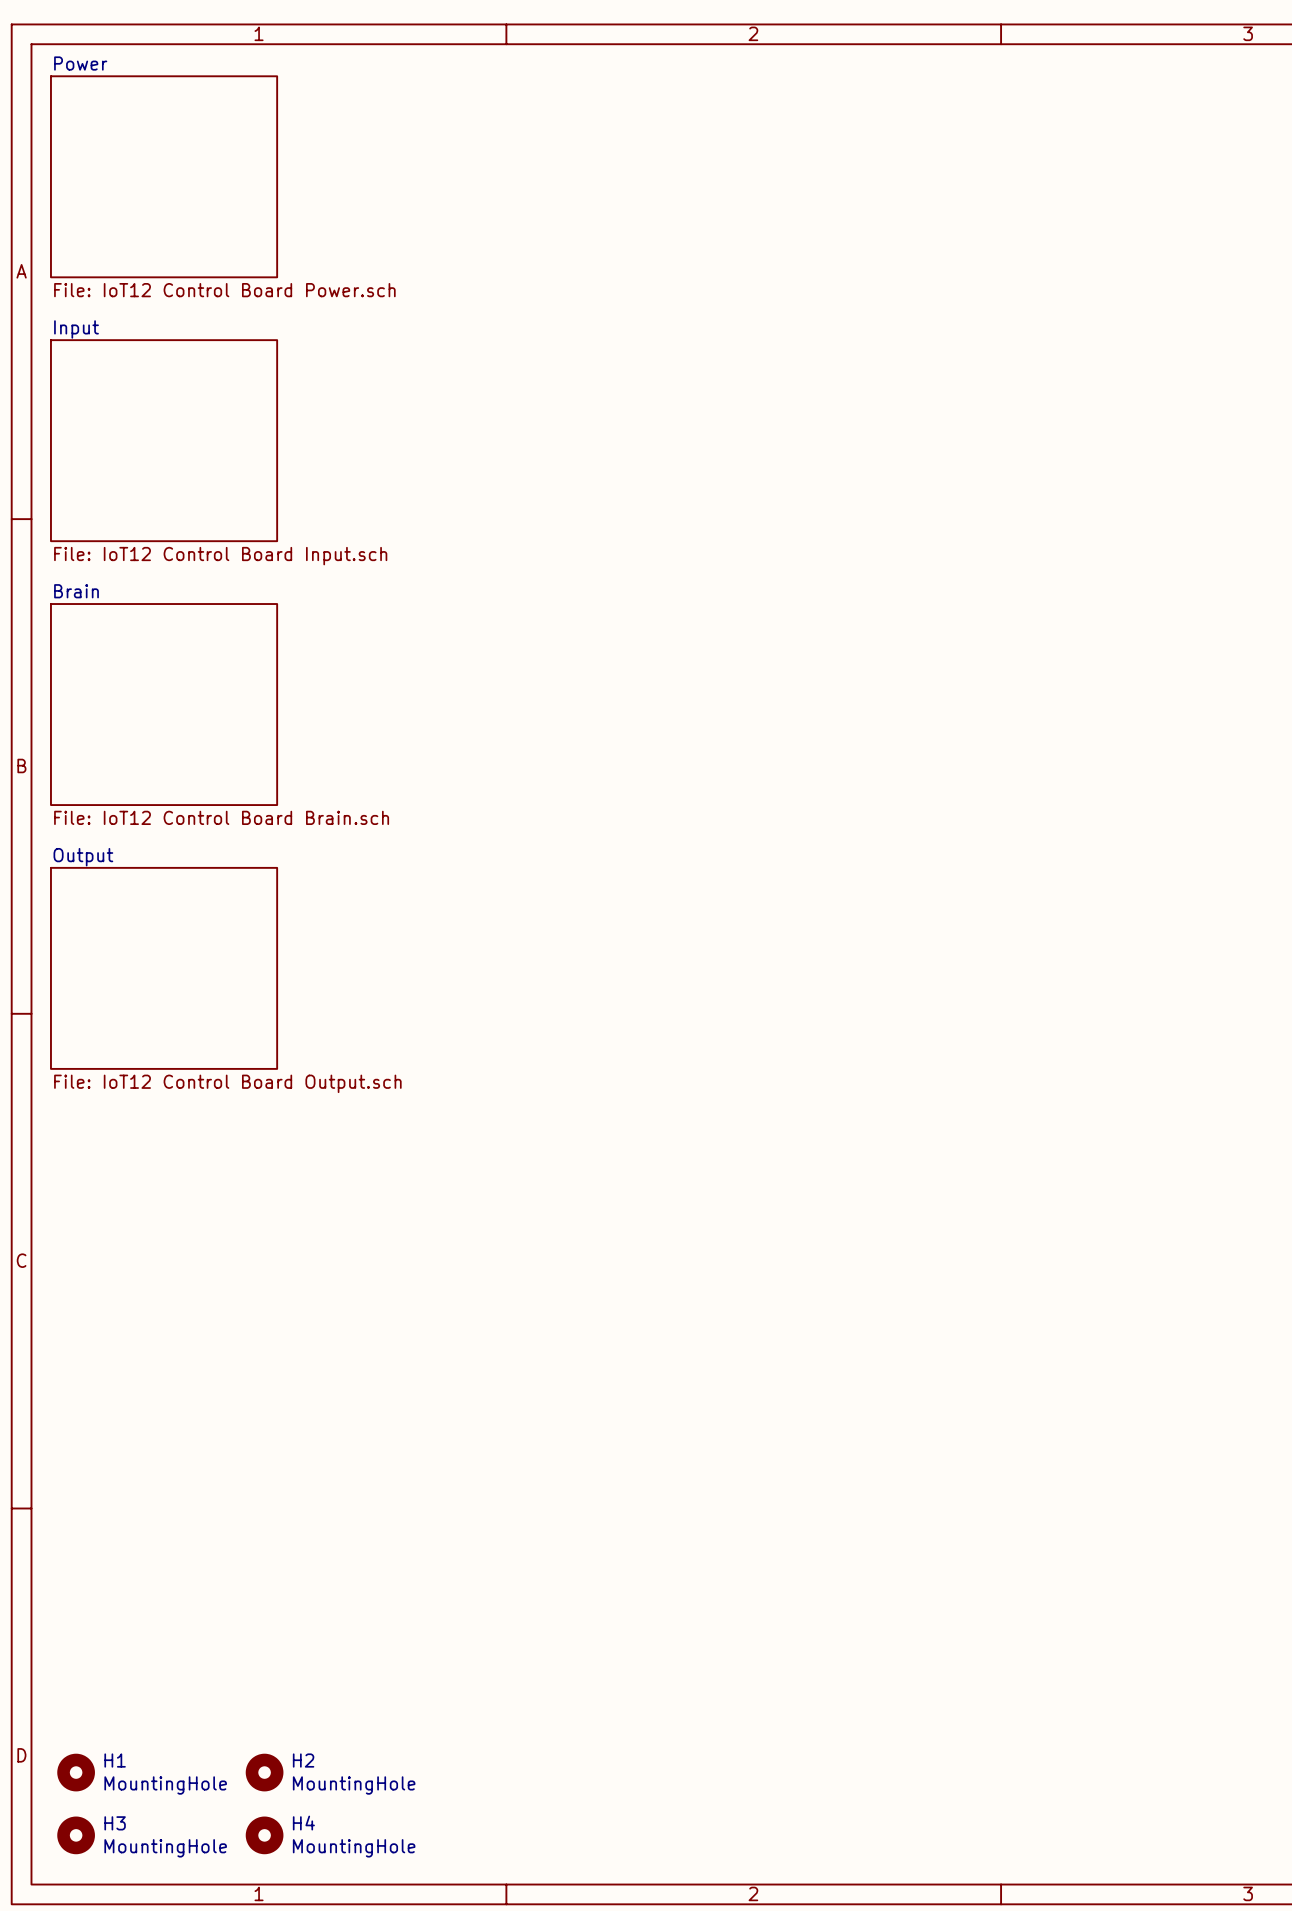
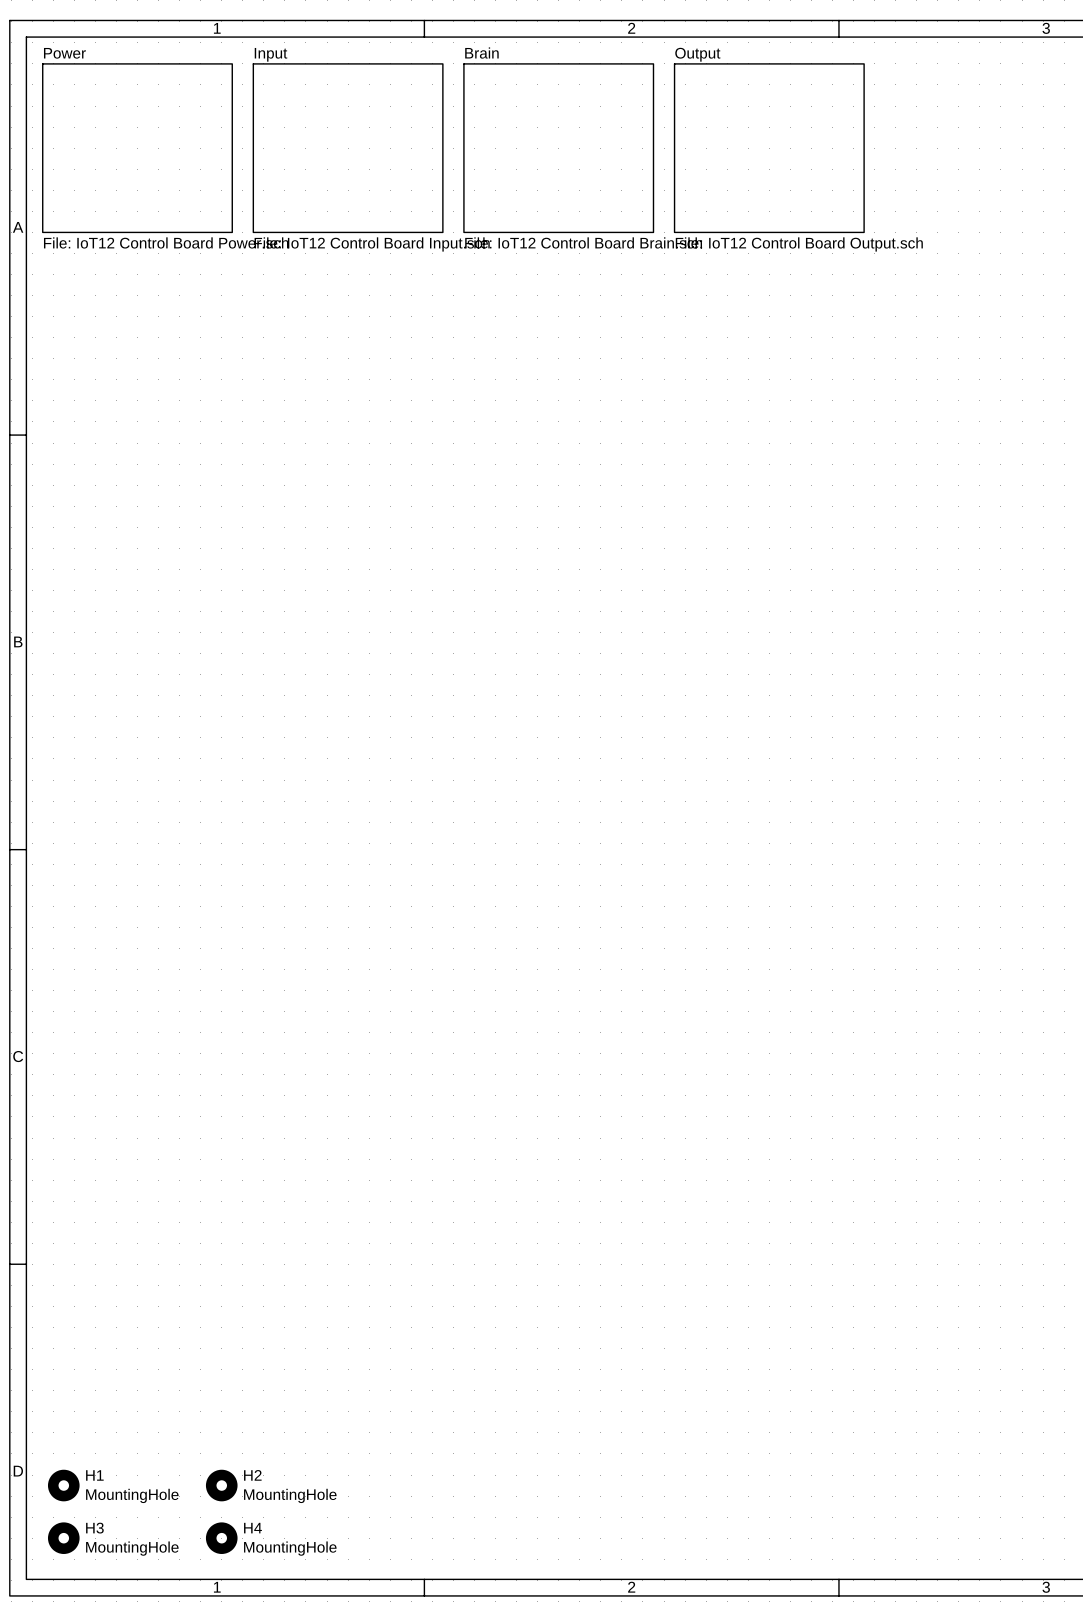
sheet Input: none -> File: IoT12 Control Board Input.sch (348, 148)
sheet Brain: none -> File: IoT12 Control Board Brain.sch (558, 148)
sheet Output: none -> File: IoT12 Control Board Output.sch (769, 148)
sheet Input: File: IoT12 Control Board Input.sch (164, 440) -> none
sheet Brain: File: IoT12 Control Board Brain.sch (164, 704) -> none
sheet Output: File: IoT12 Control Board Output.sch (164, 968) -> none

